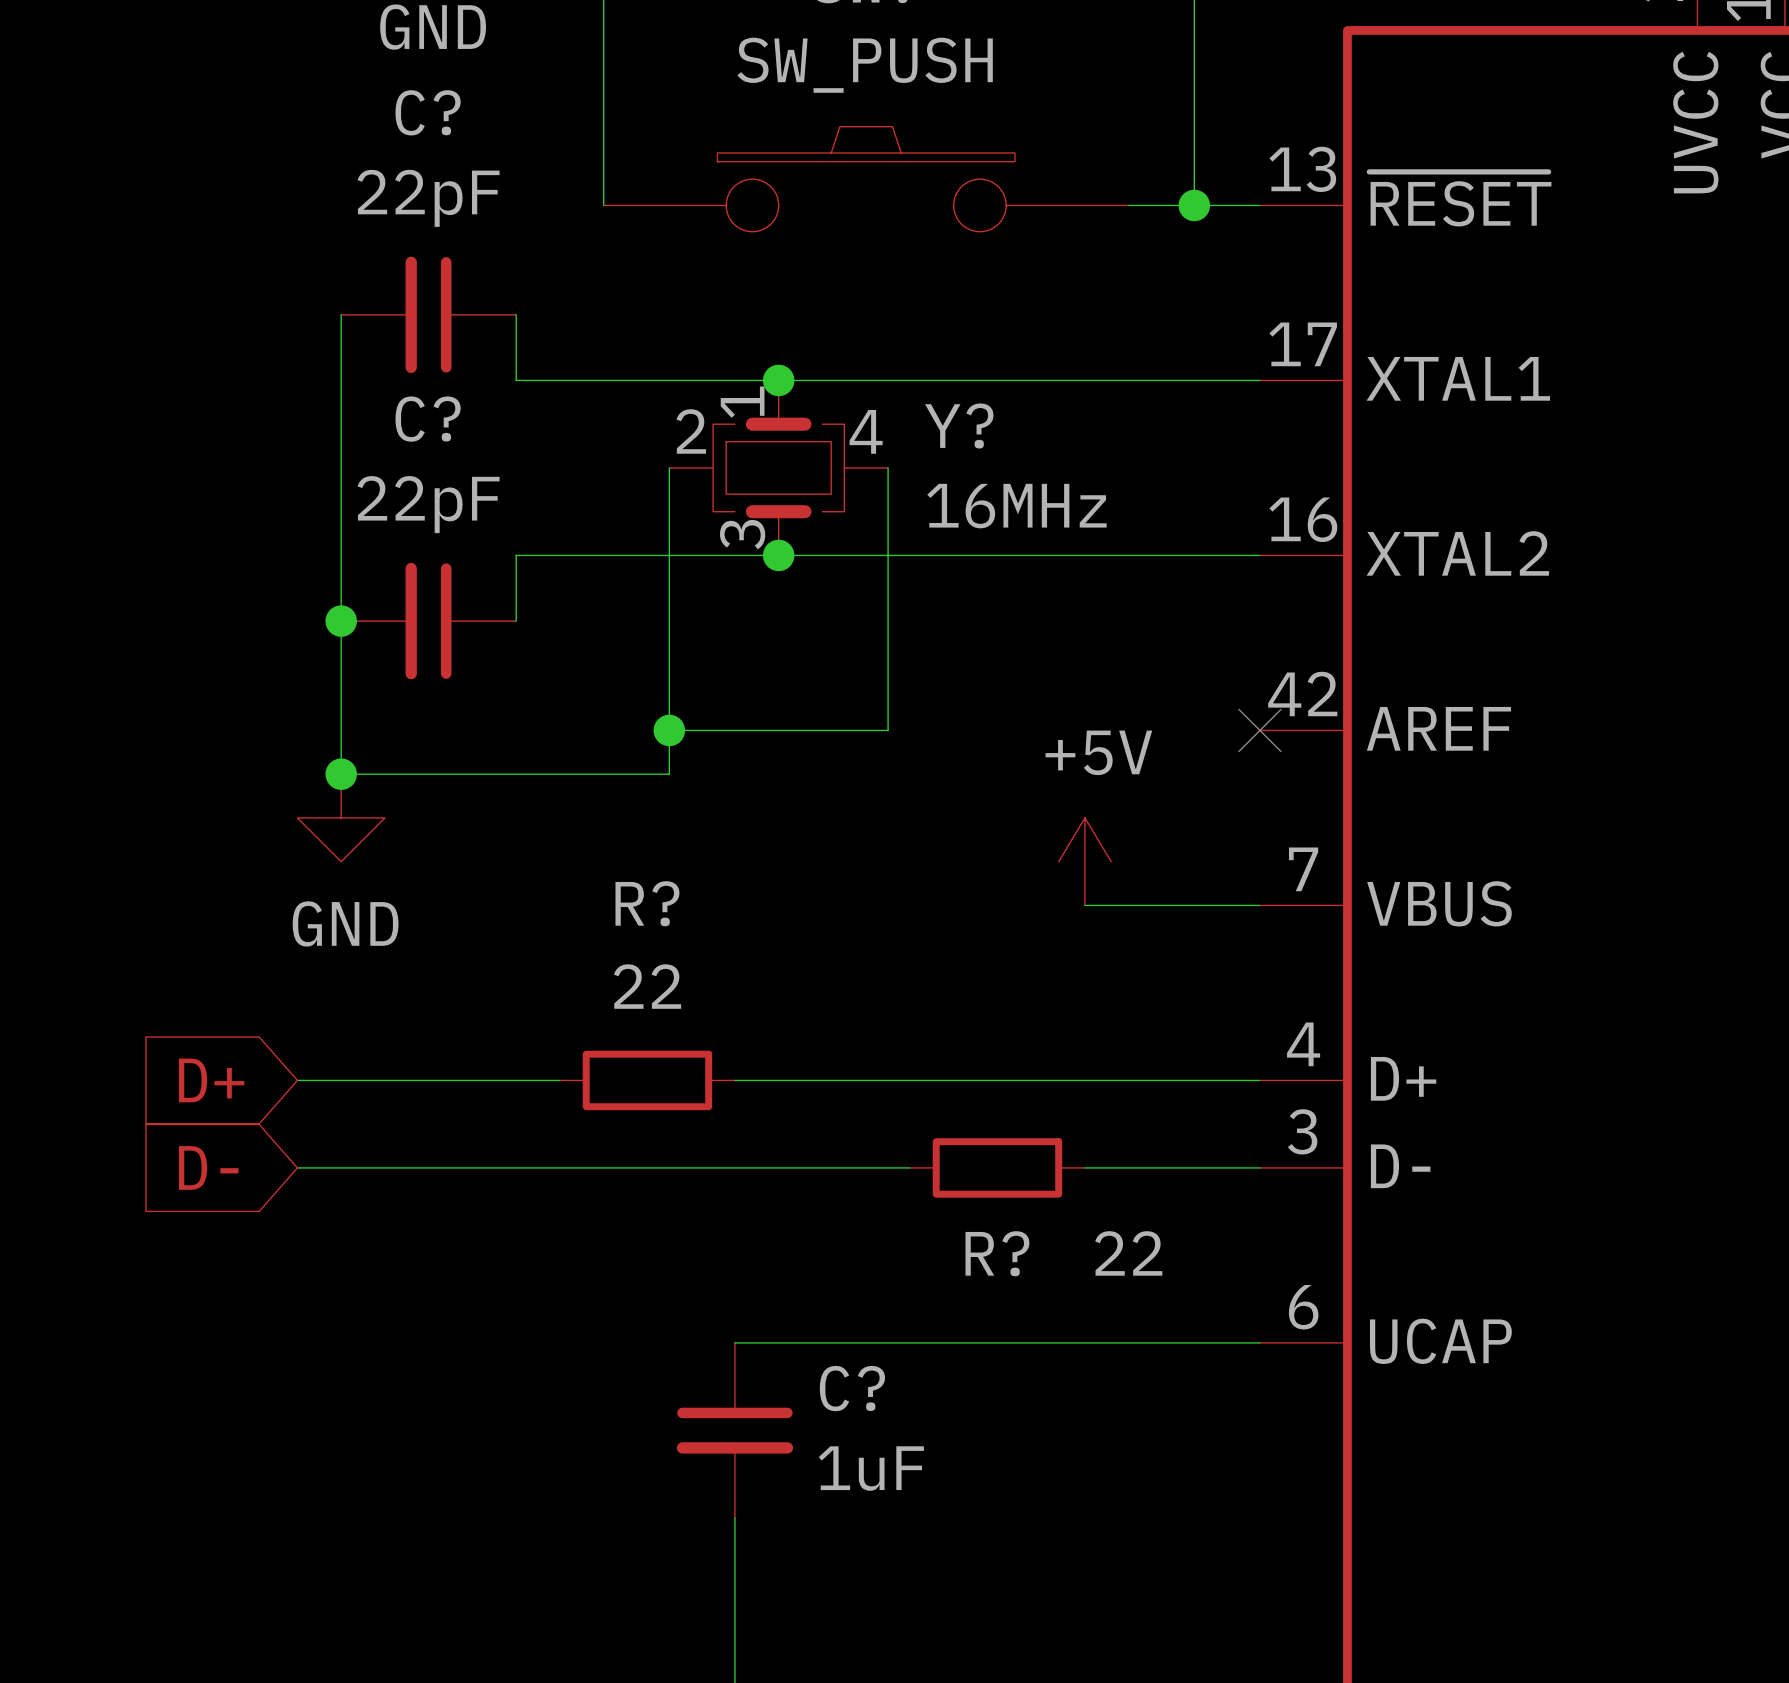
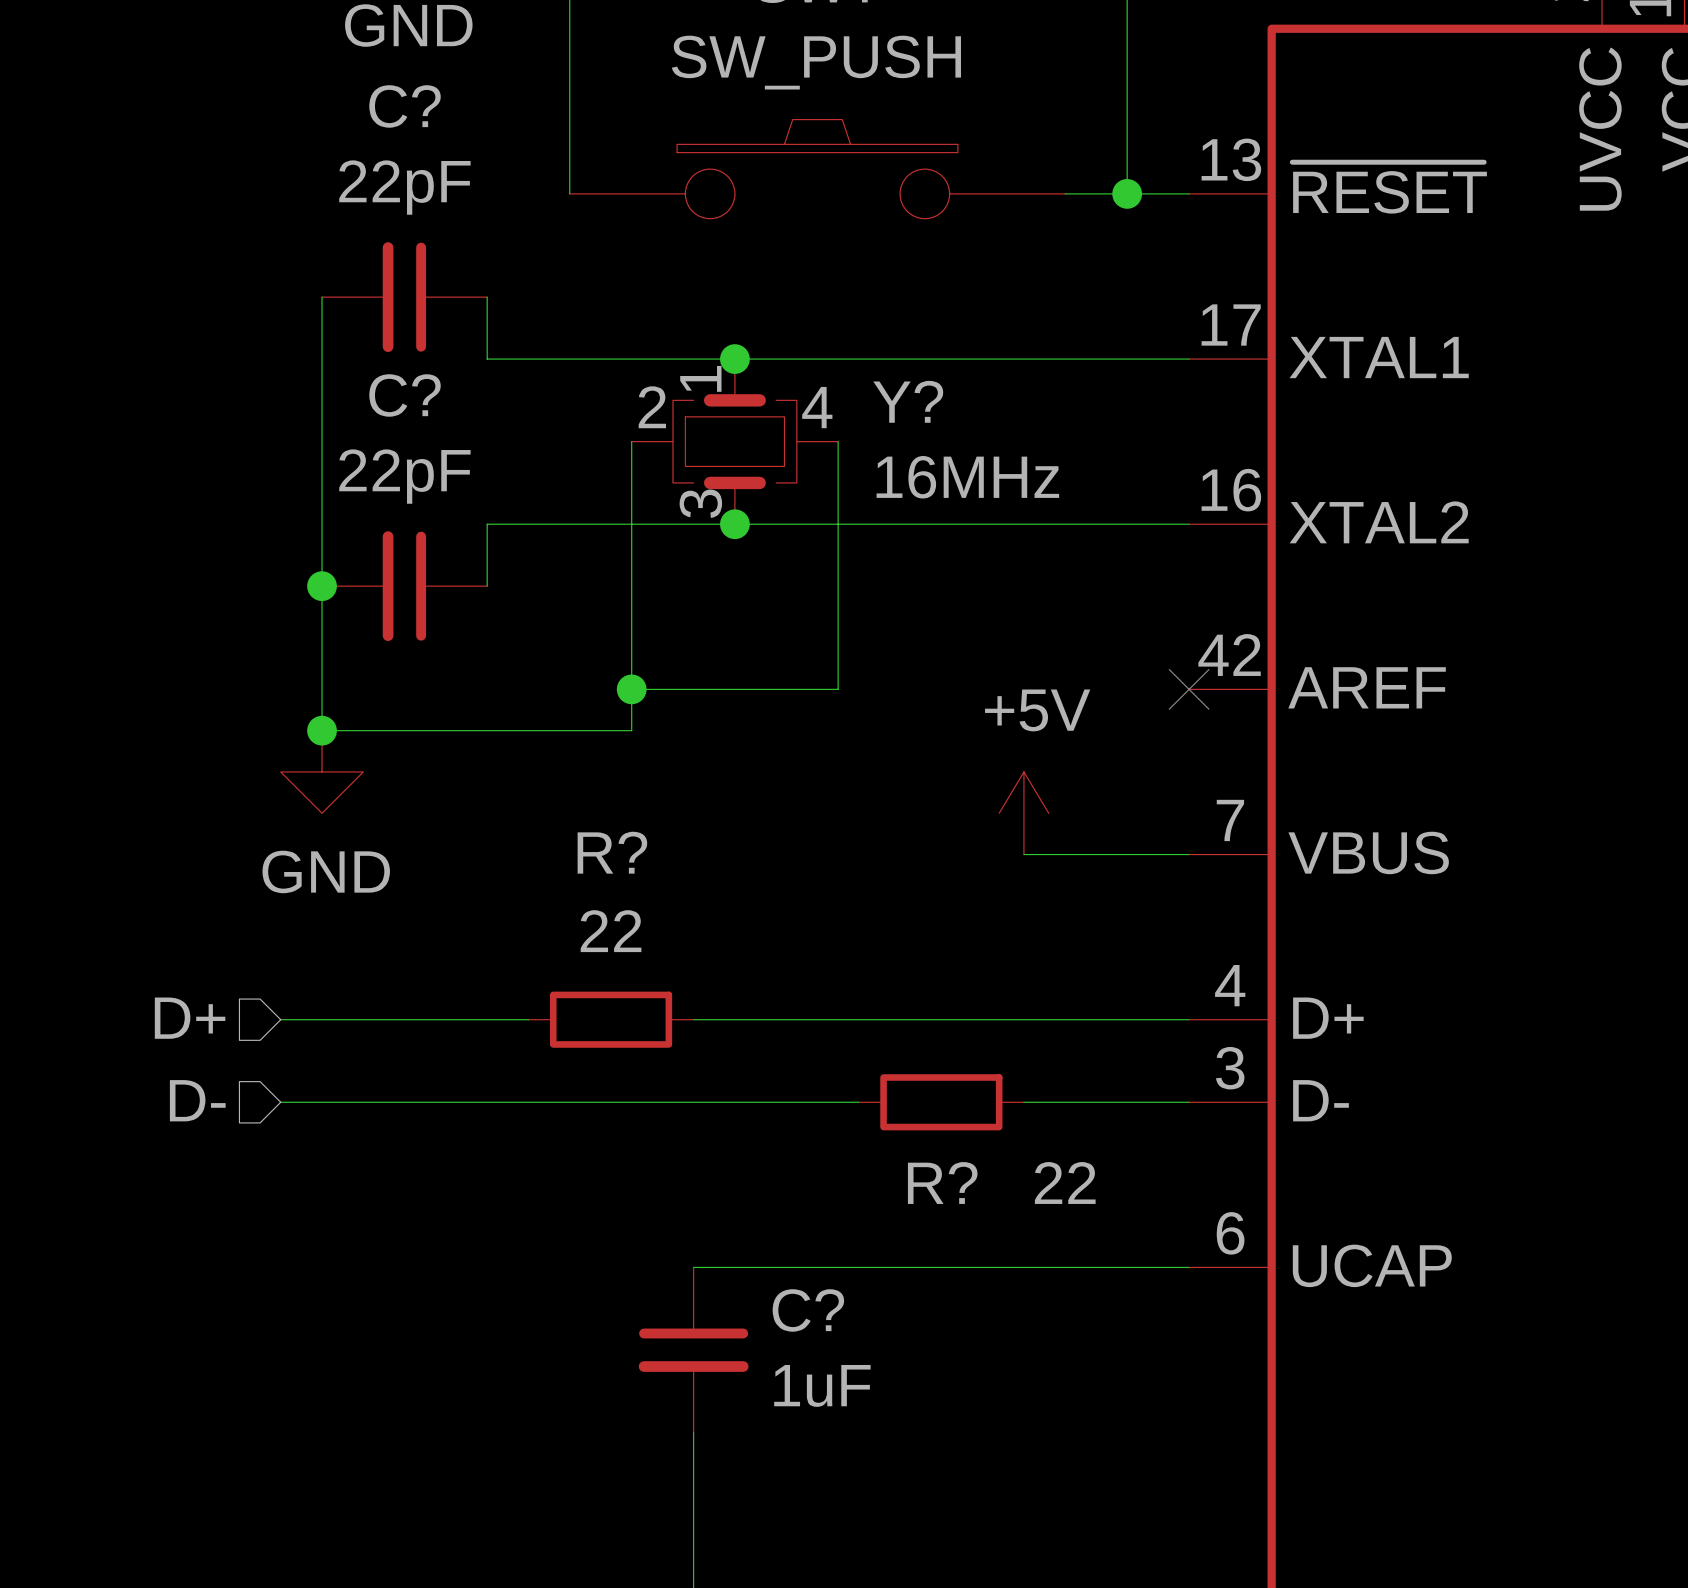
hierarchical label: none -> D+ (190, 1018)
global label: D+ (211, 1080) -> none
hierarchical label: none -> D- (197, 1100)
global label: D- (208, 1167) -> none

